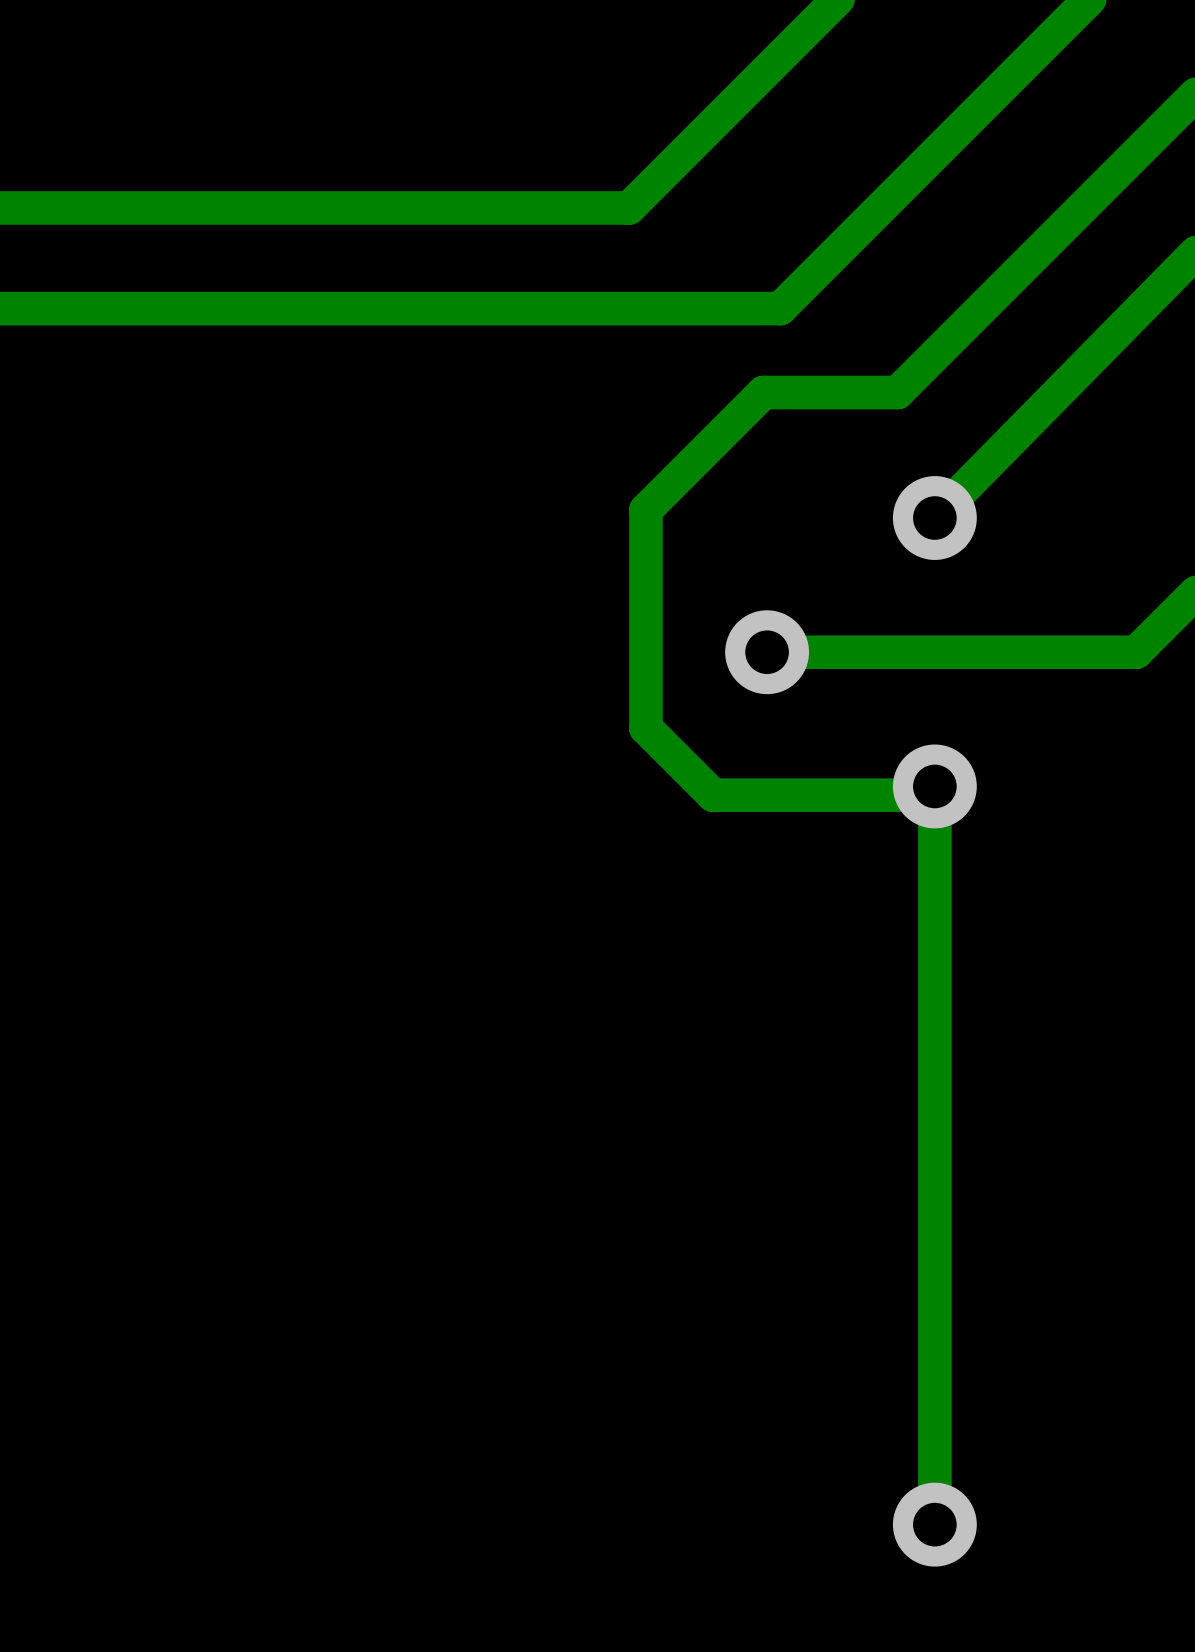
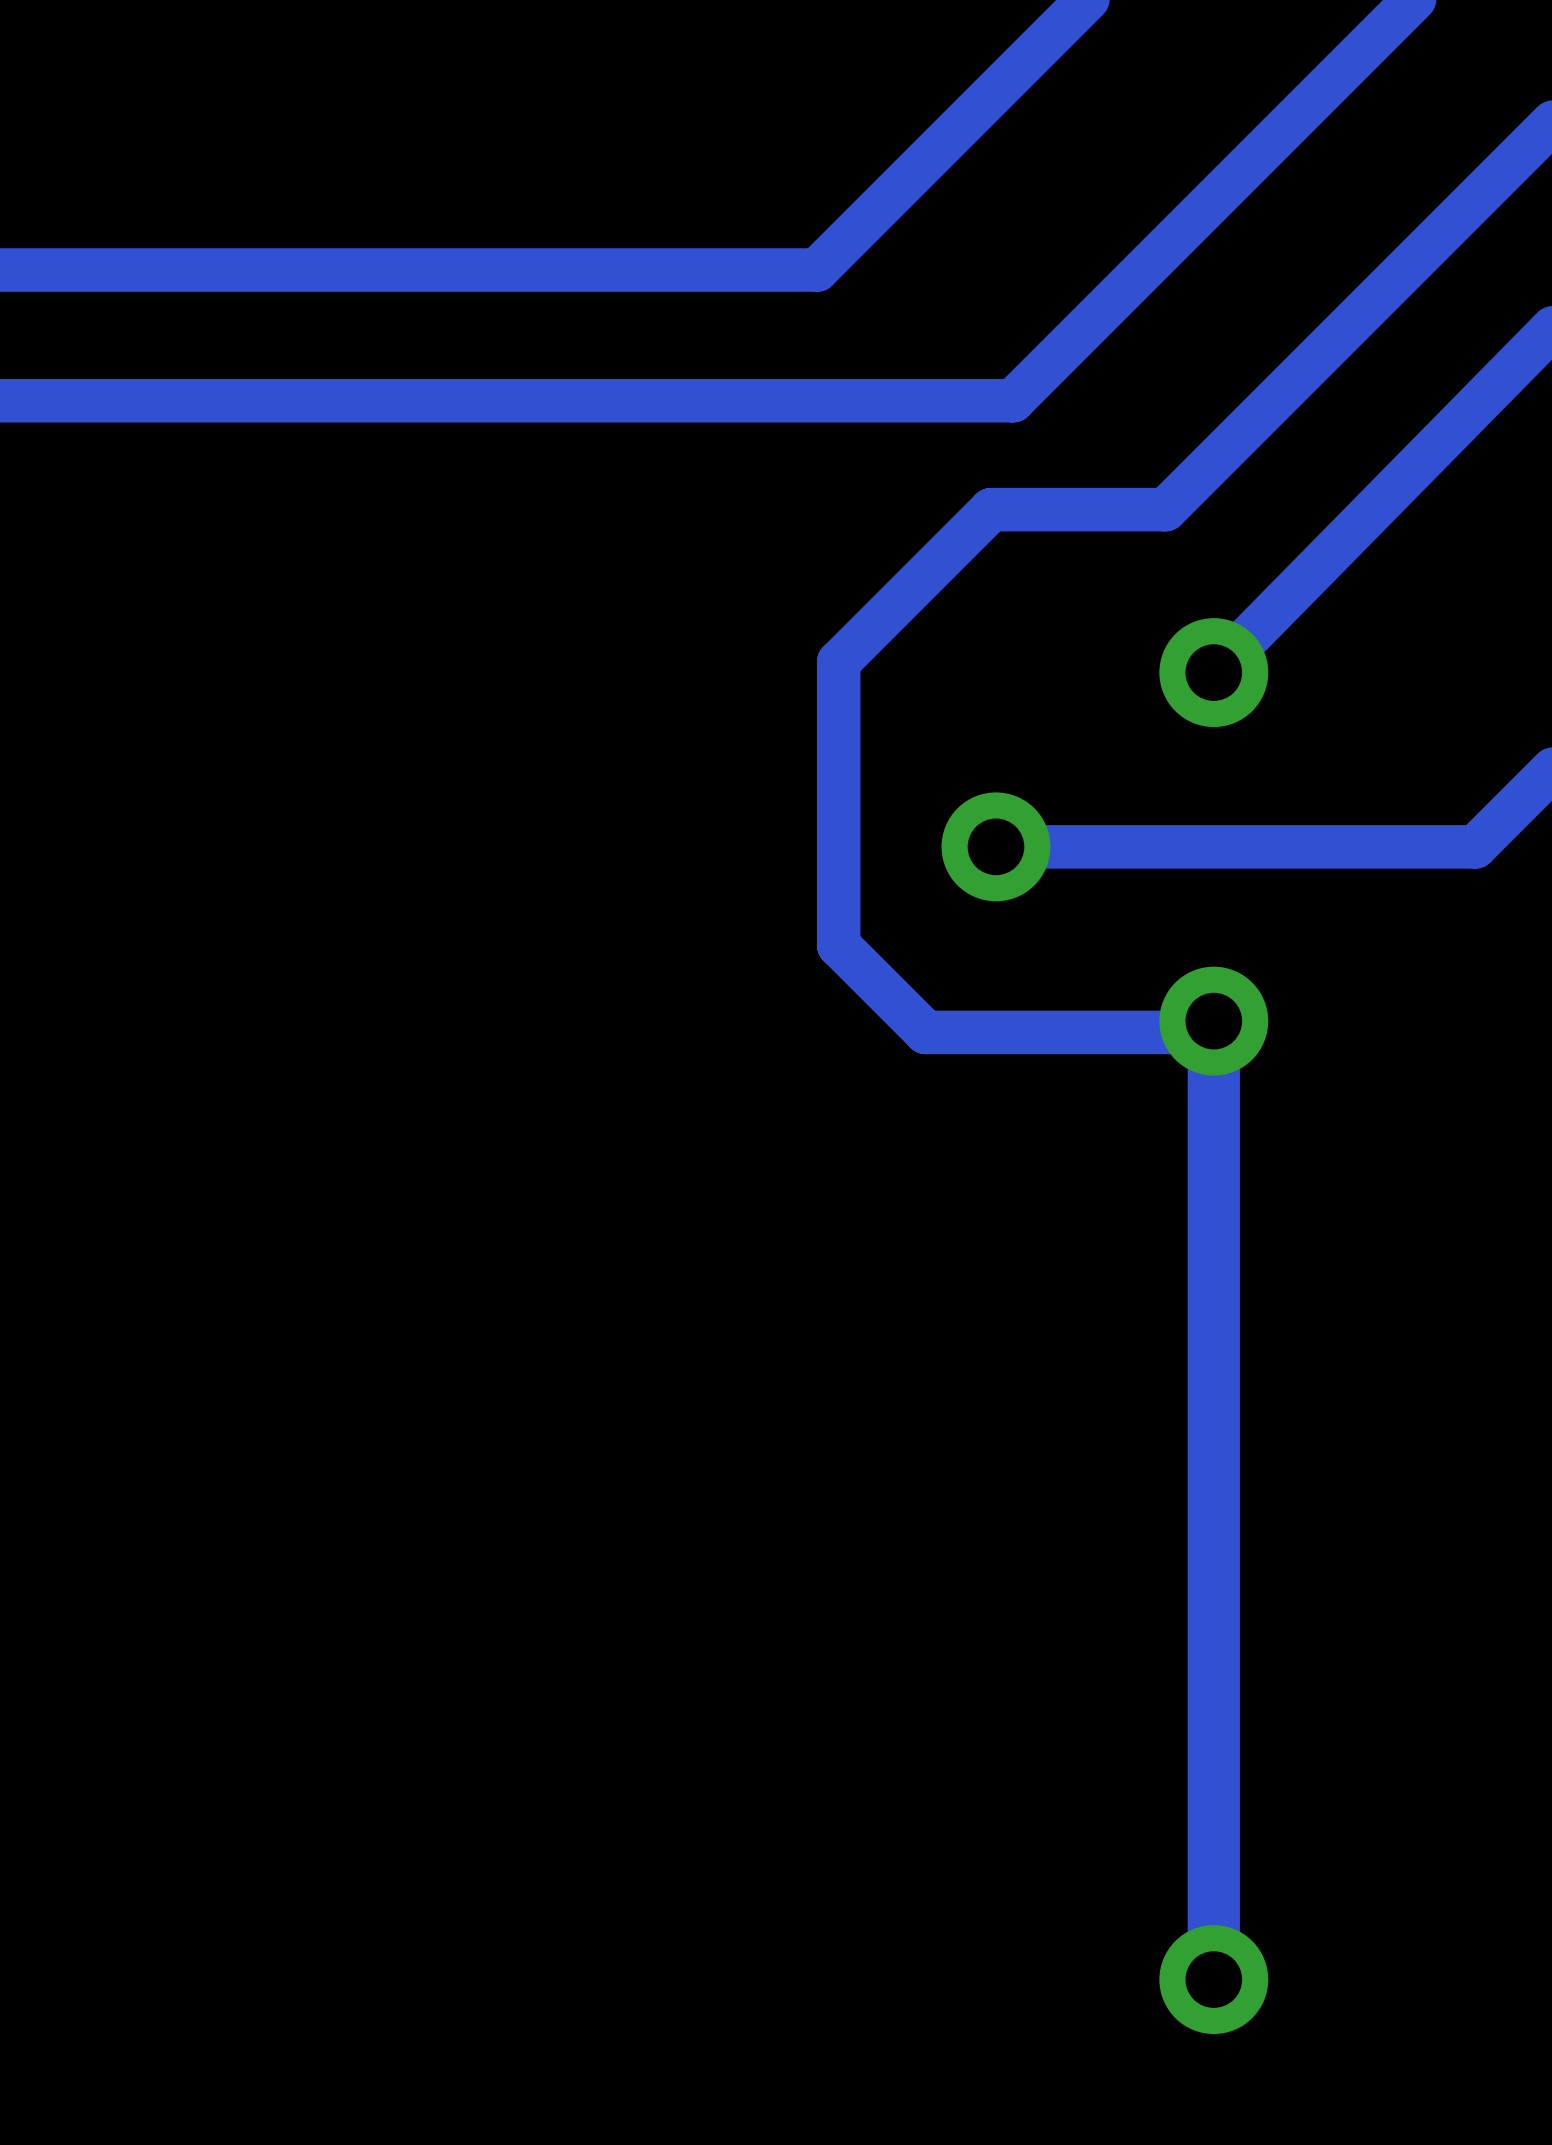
track width: thin (934, 786) (934, 1524) -> thick (1213, 1021) (1213, 1979)

